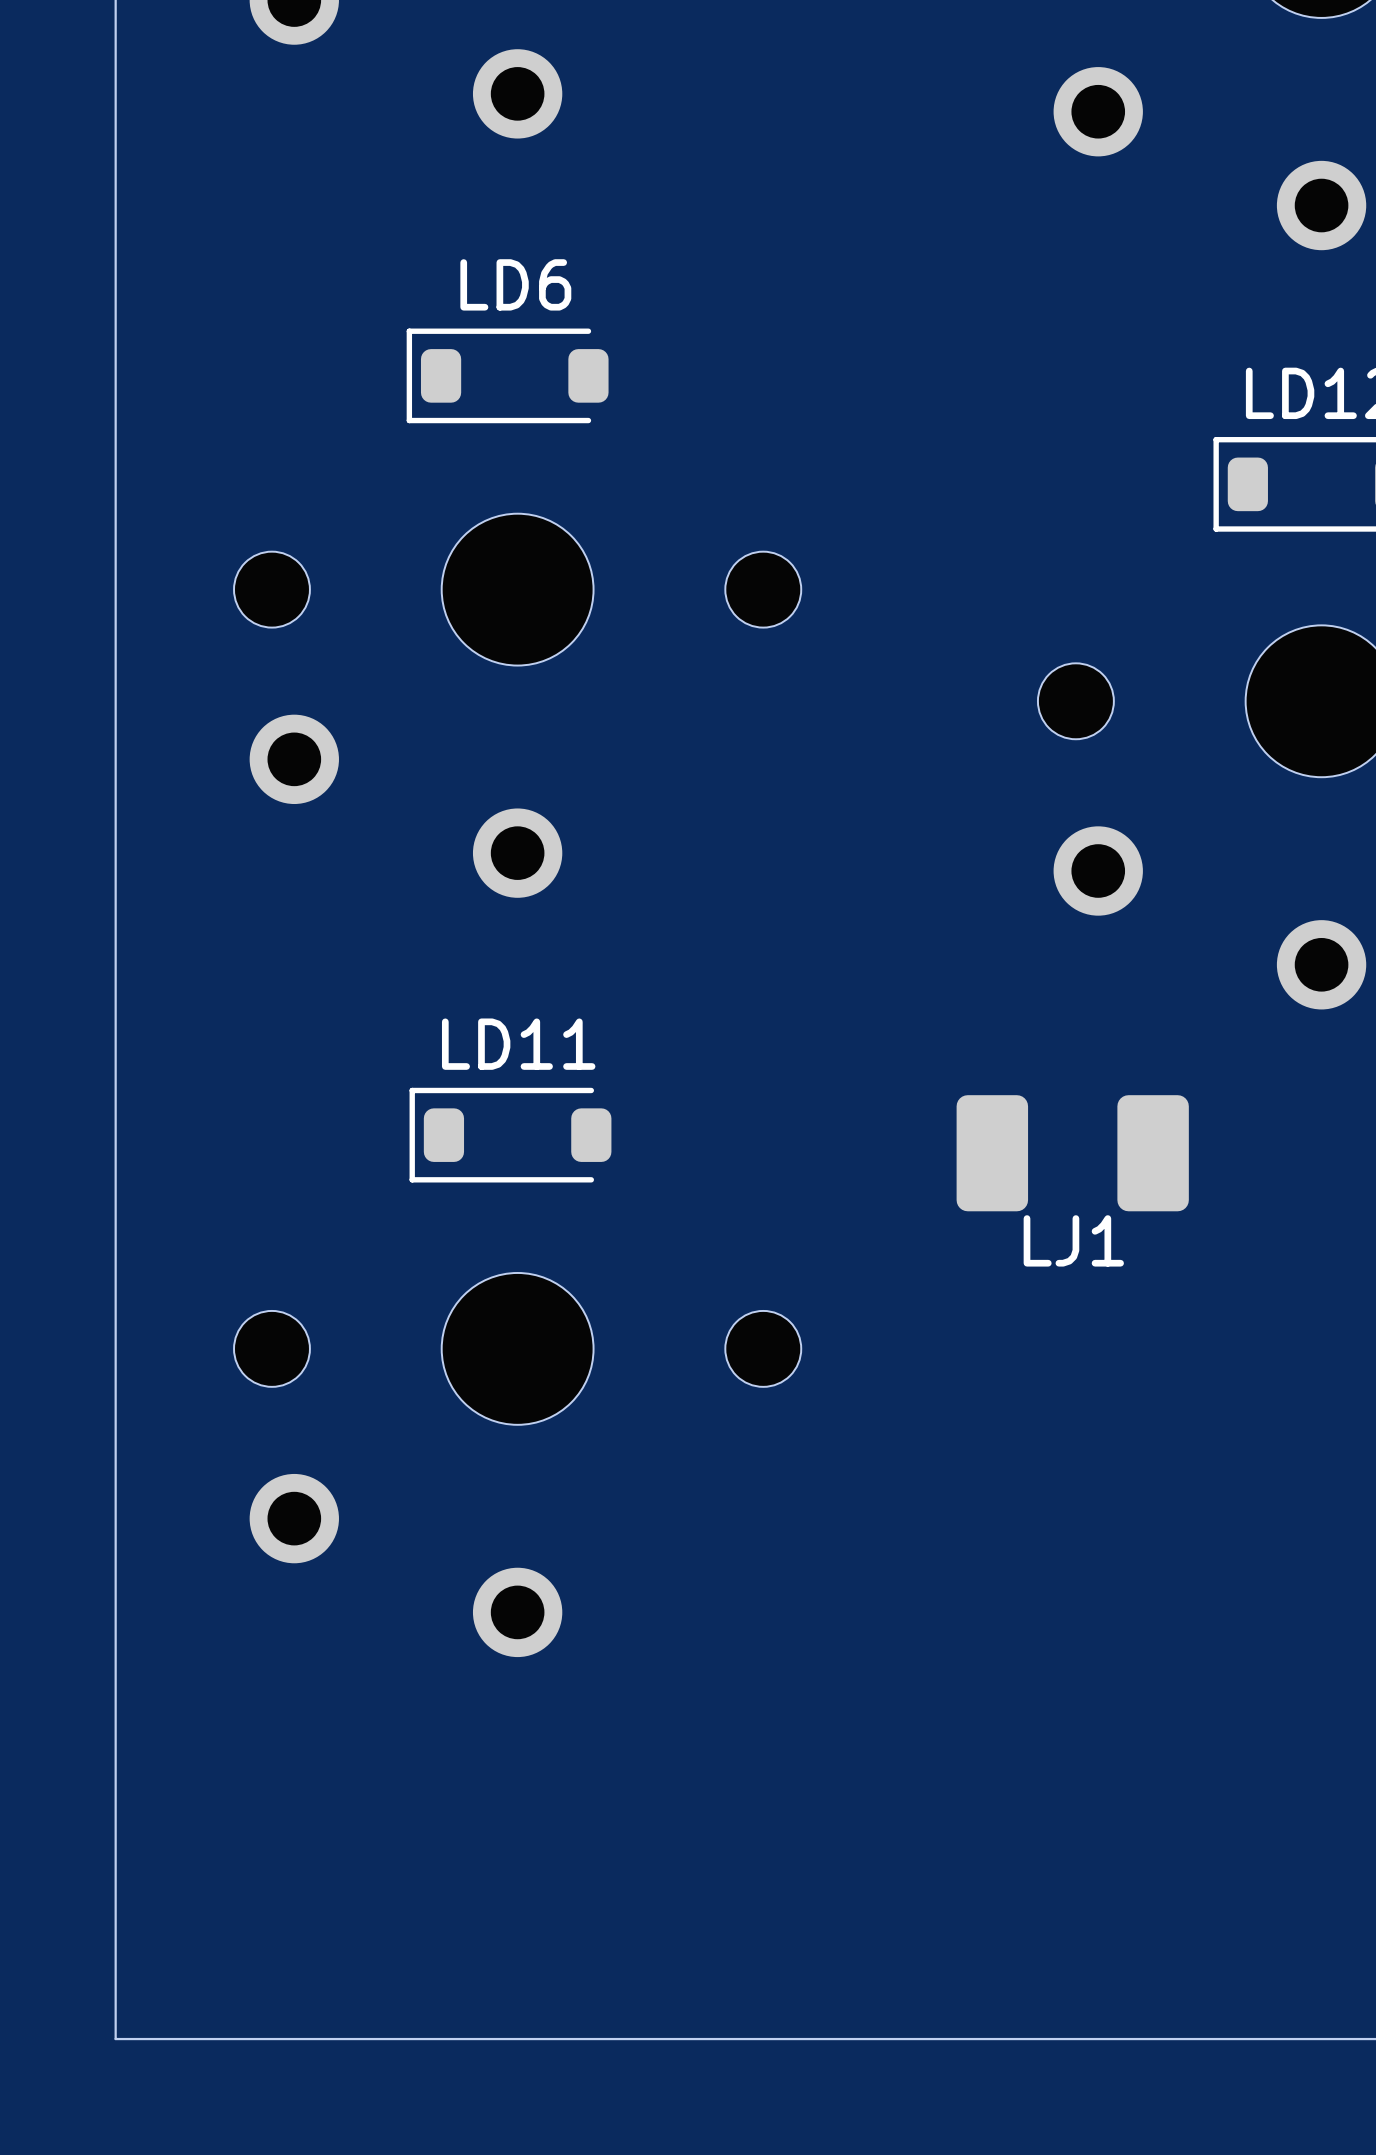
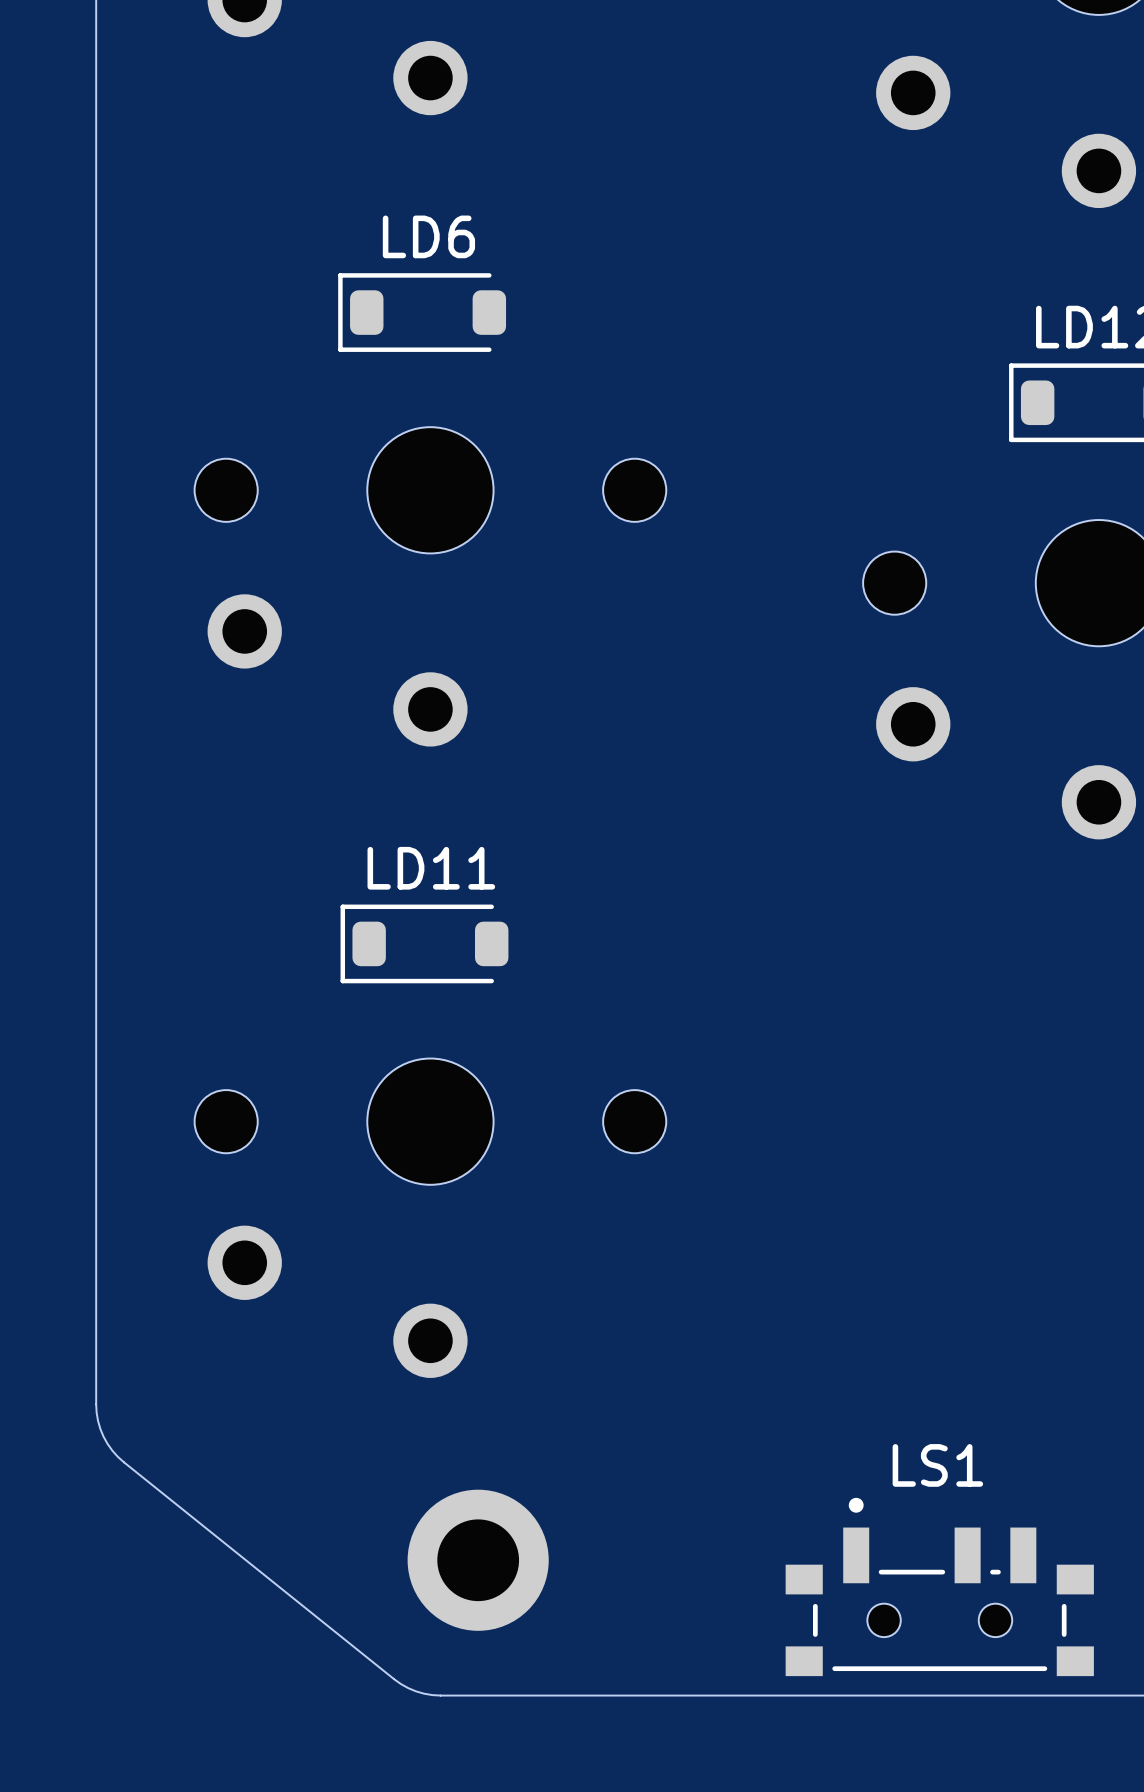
LJ1: (1072, 1153) -> none
board edge: (115, 1688) (115, 2039) (529, 2039) -> (96, 1404) (98, 1420) (103, 1436) (112, 1450) (123, 1462) (394, 1679) (415, 1691) (440, 1695)
part: none -> (478, 1560)
LS1: none -> (939, 1586)

